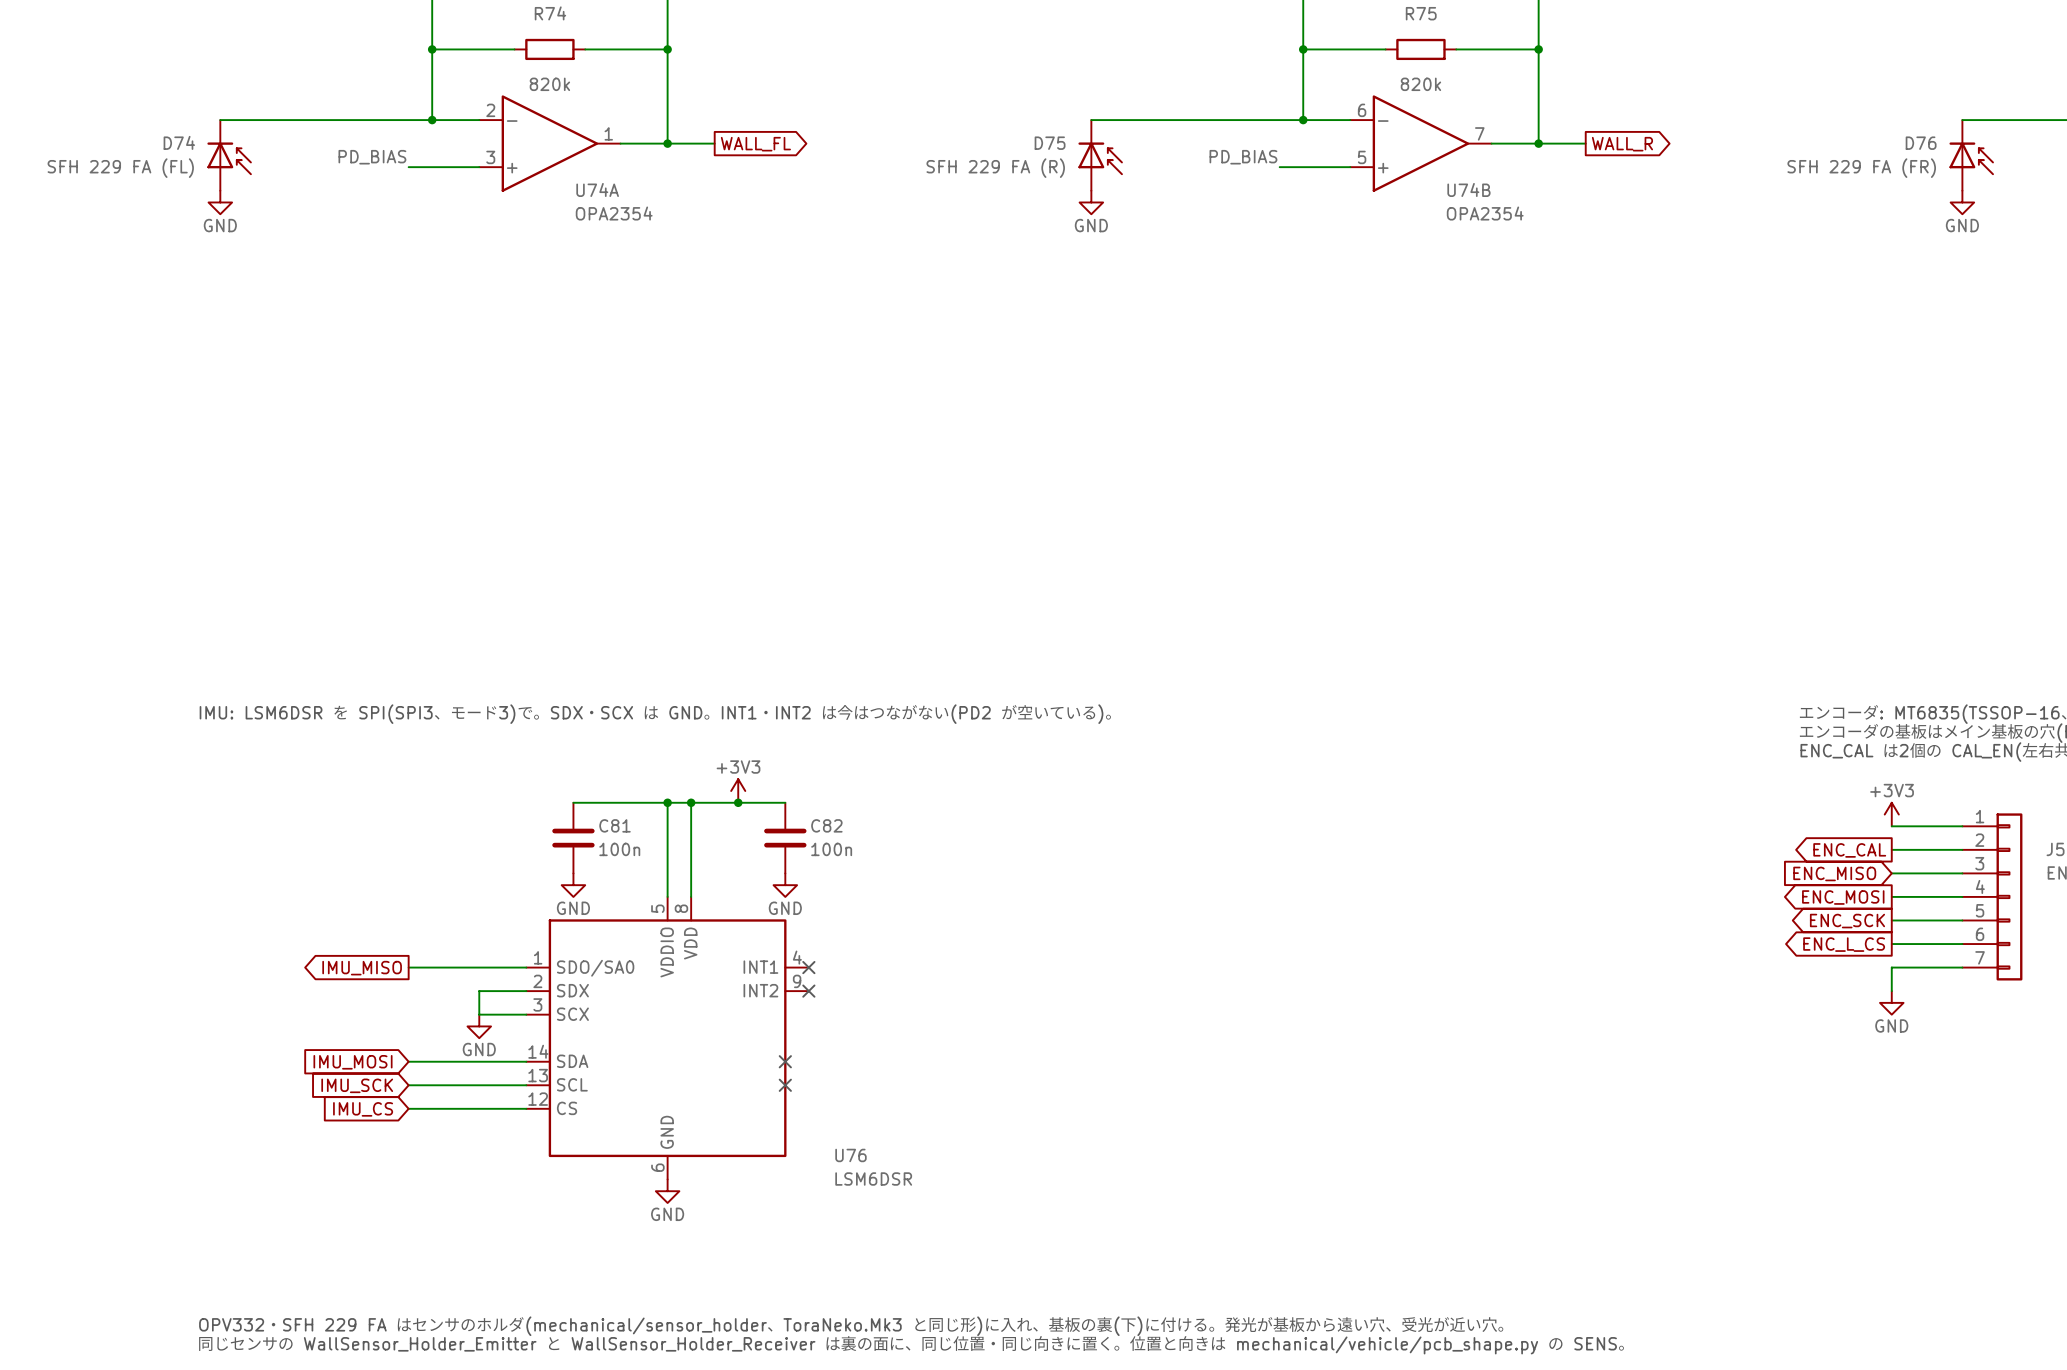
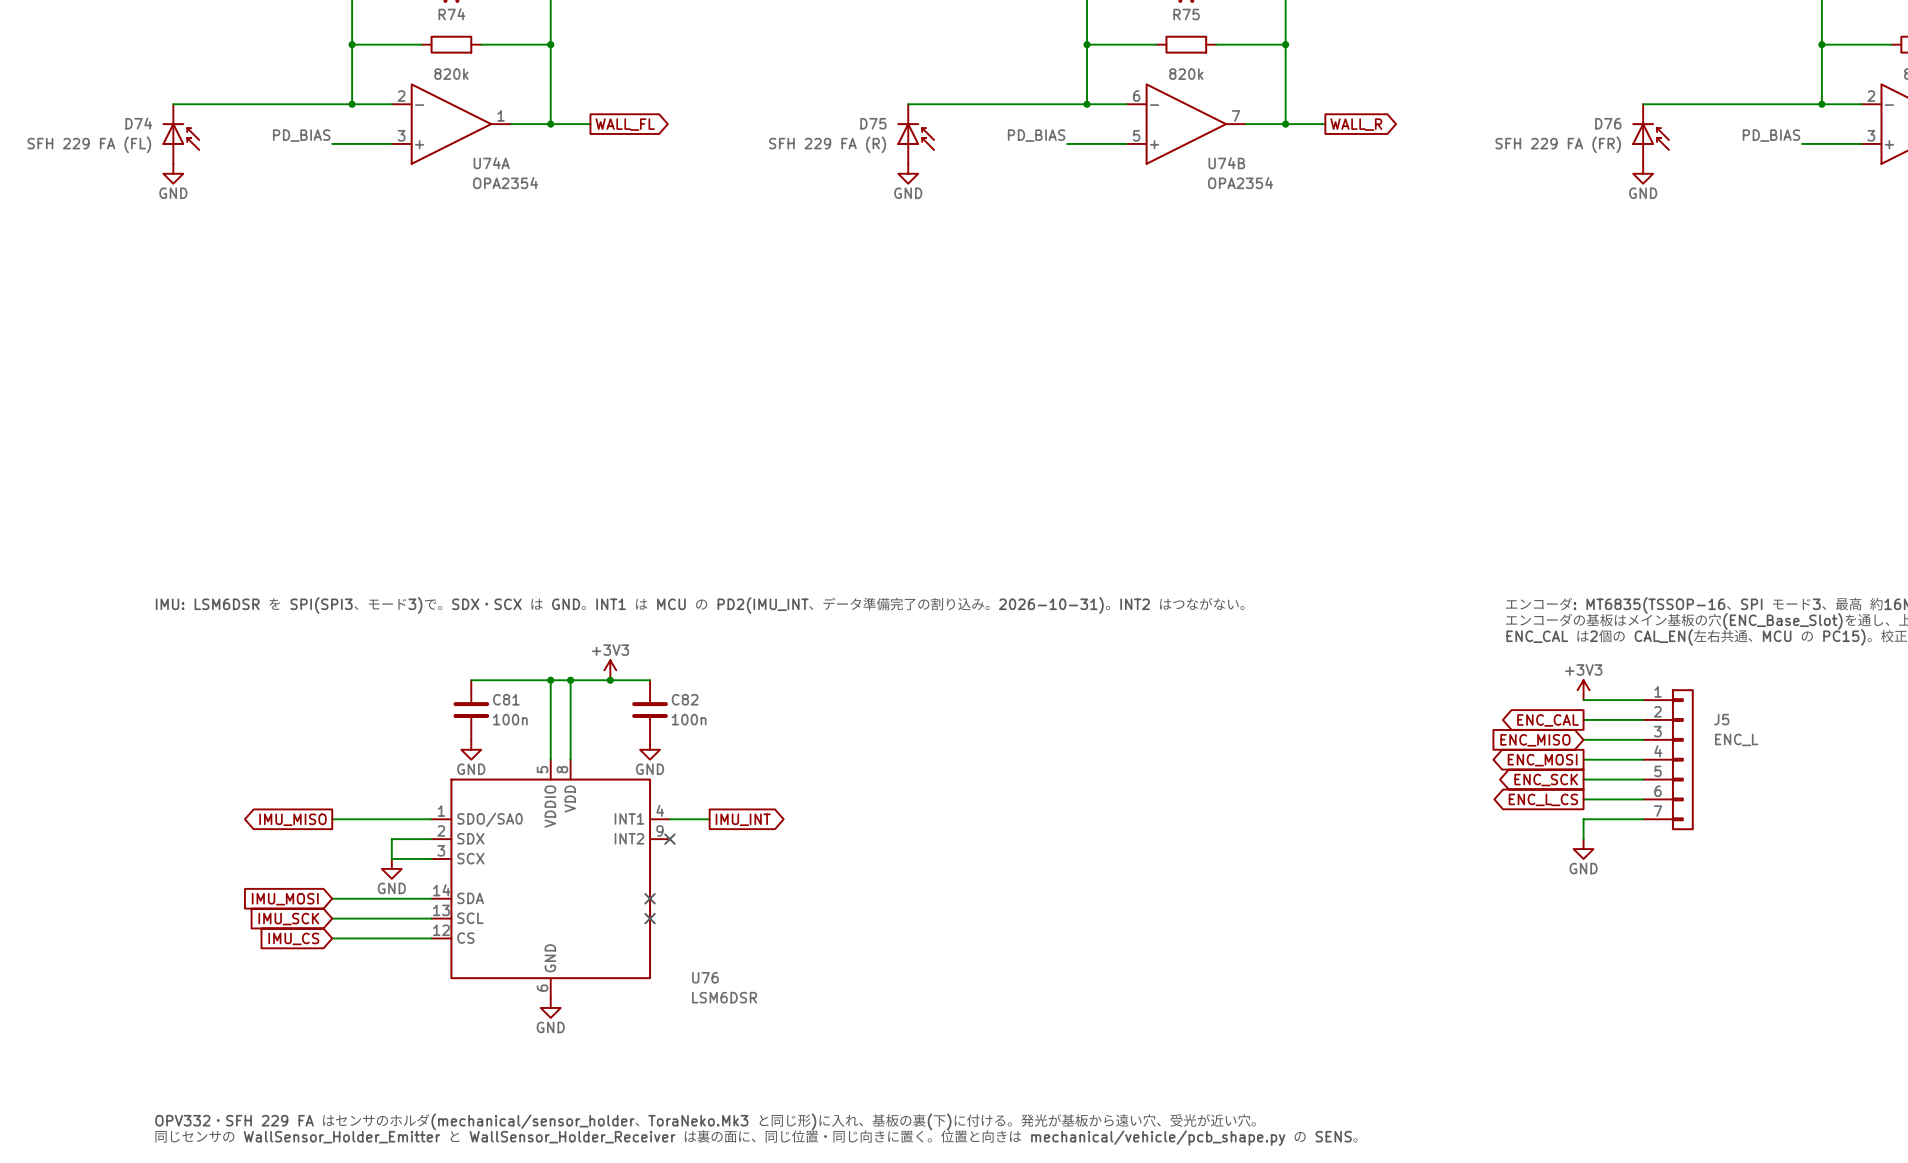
text: IMU: LSM6DSR を SPI(SPI3、モード3)で。SDX・SCX は GND。INT1・INT2 は今はつながない(PD2 が空いている)。 (655, 714) -> IMU: LSM6DSR を SPI(SPI3、モード3)で。SDX・SCX は GND。INT1 は MCU の PD2(IMU_INT、データ準備完了の割り込み。2026-10-31)。INT2 はつながない。 (700, 605)
wire: none -> (669, 819) (709, 819)
no-connect mark: (808, 967) -> none
global label: none -> IMU_INT (743, 819)

